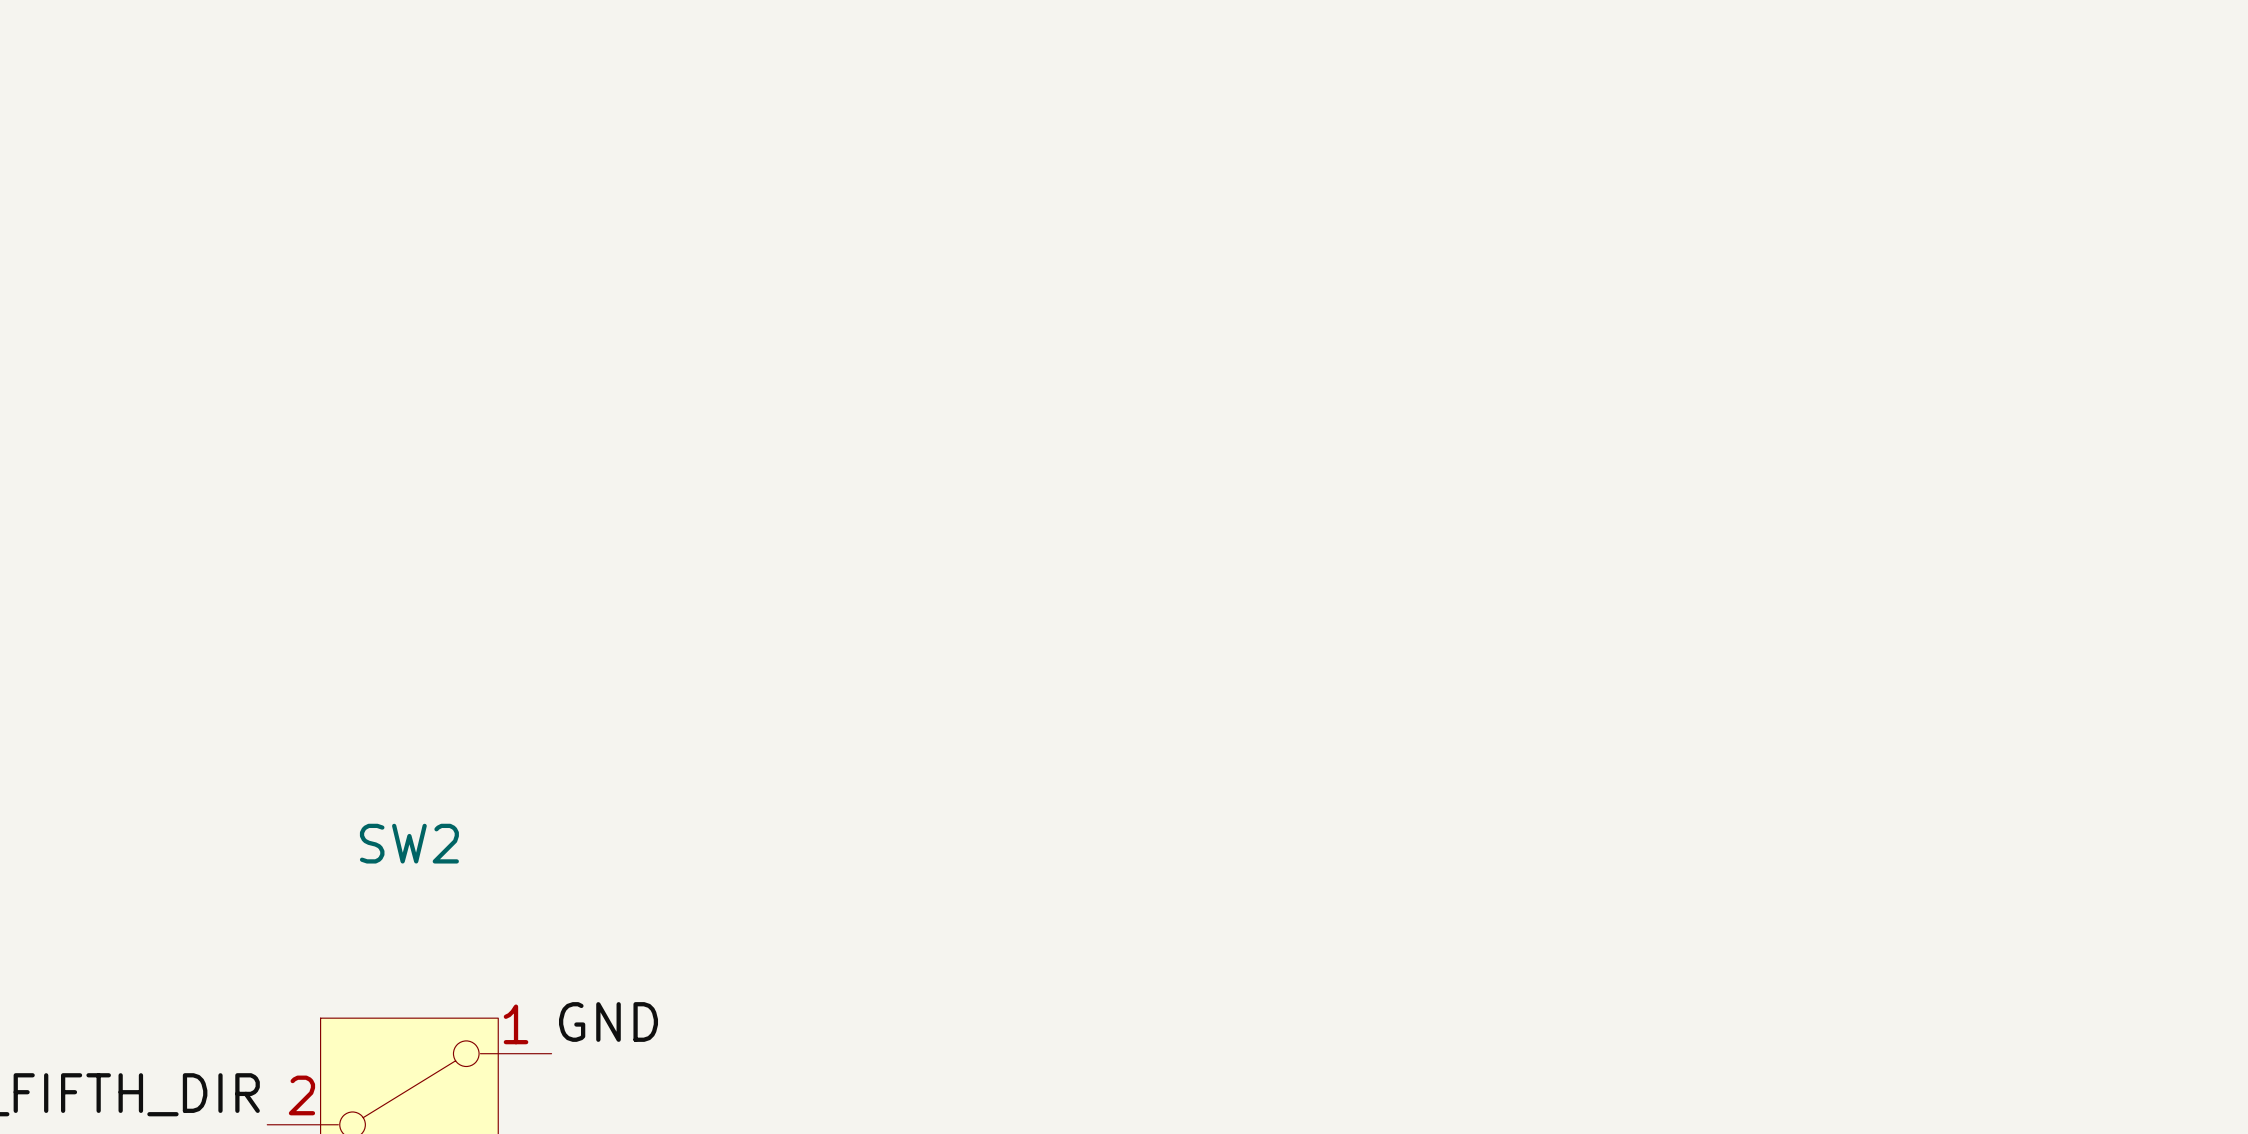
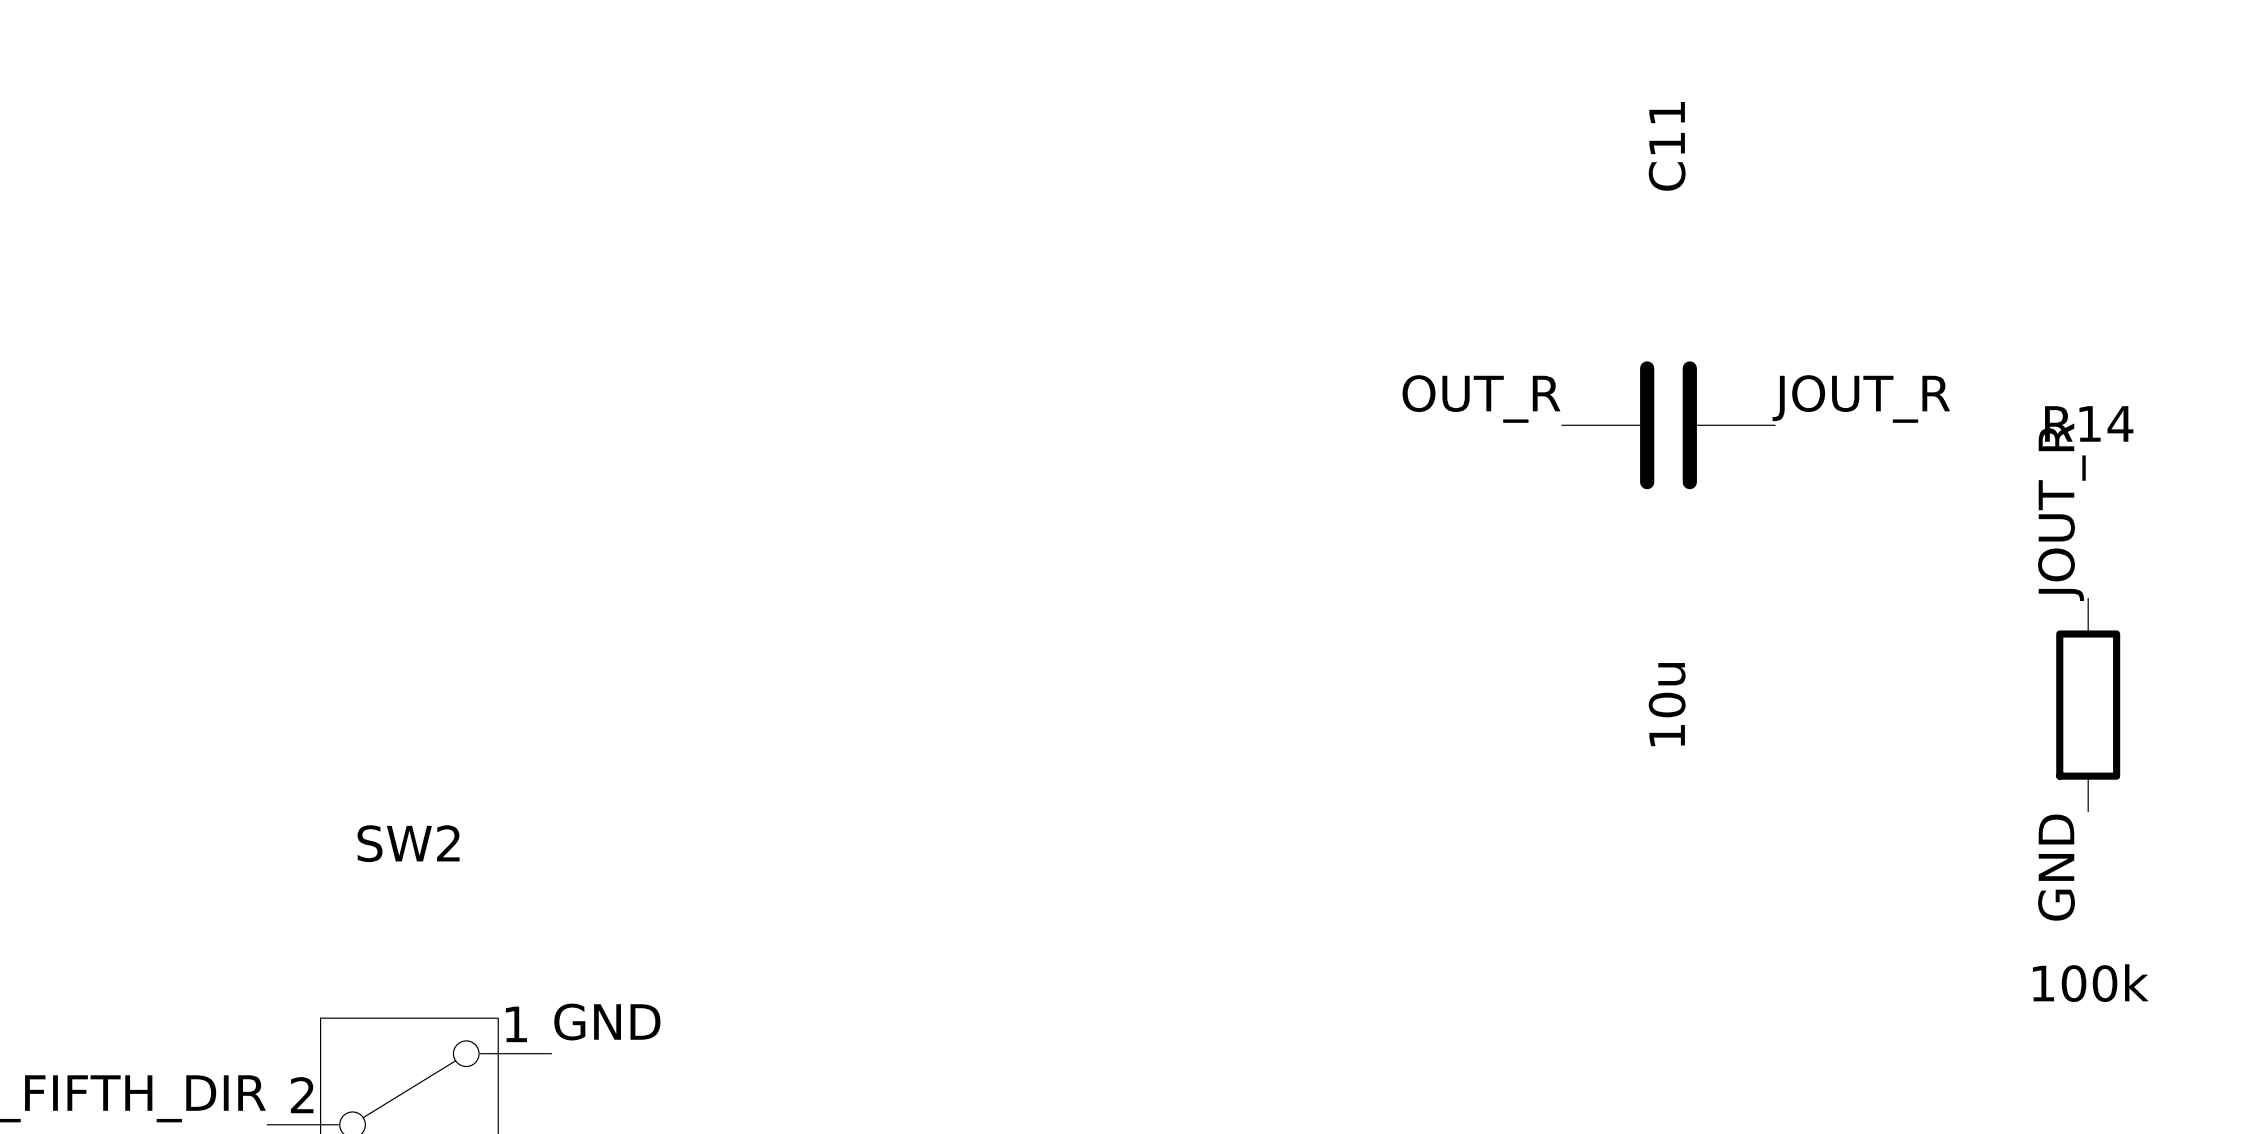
label: none -> OUT_R (1481, 399)
label: none -> JOUT_R (1861, 399)
C11: none -> 10u (1668, 425)
label: none -> JOUT_R (2061, 512)
R14: none -> 100k (2088, 705)
label: none -> GND (2056, 867)

